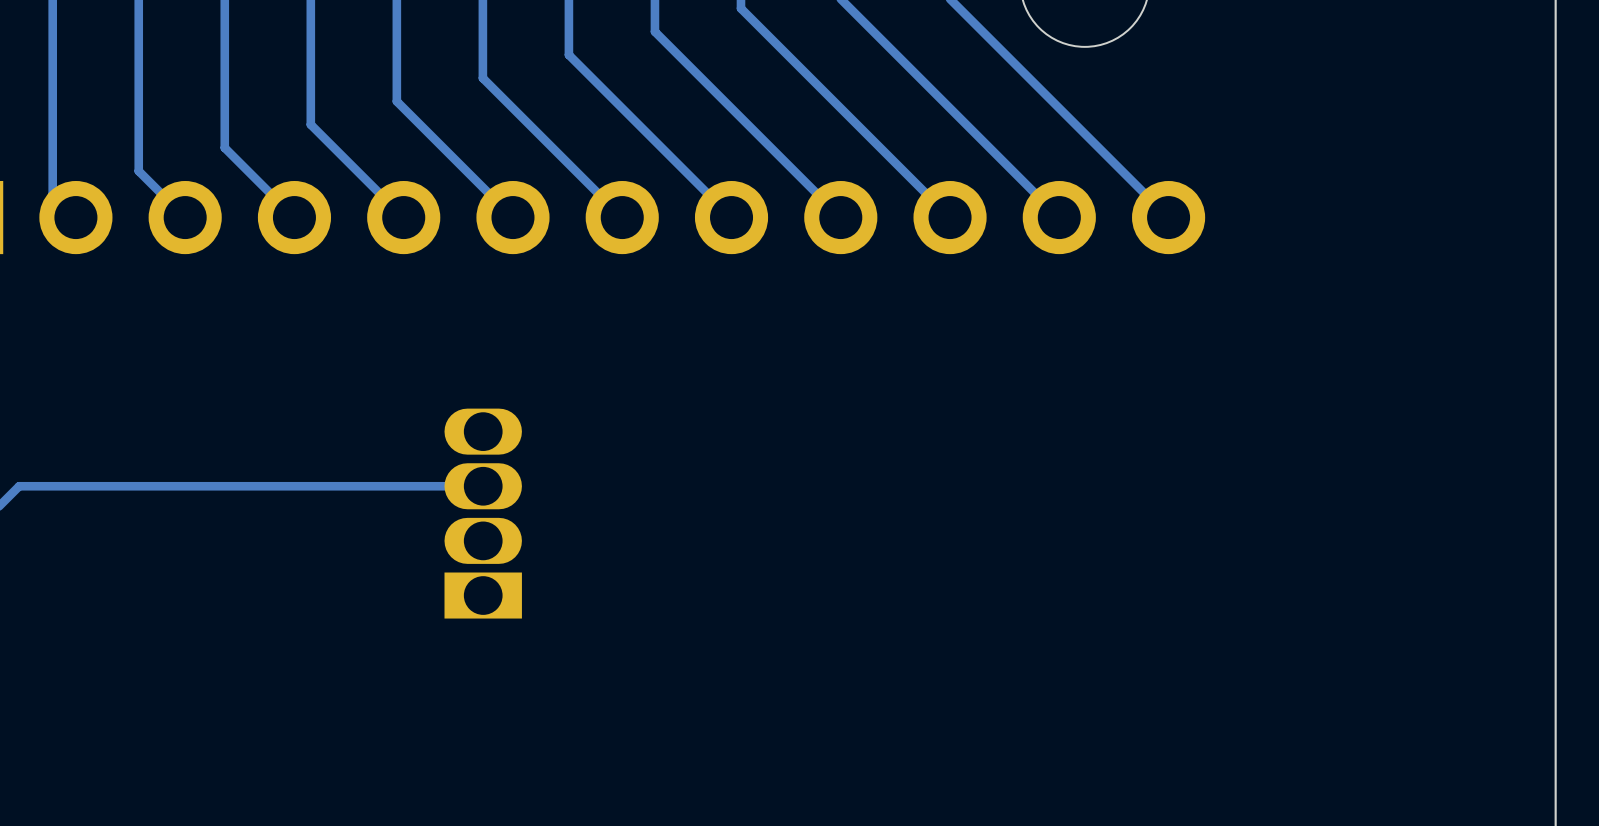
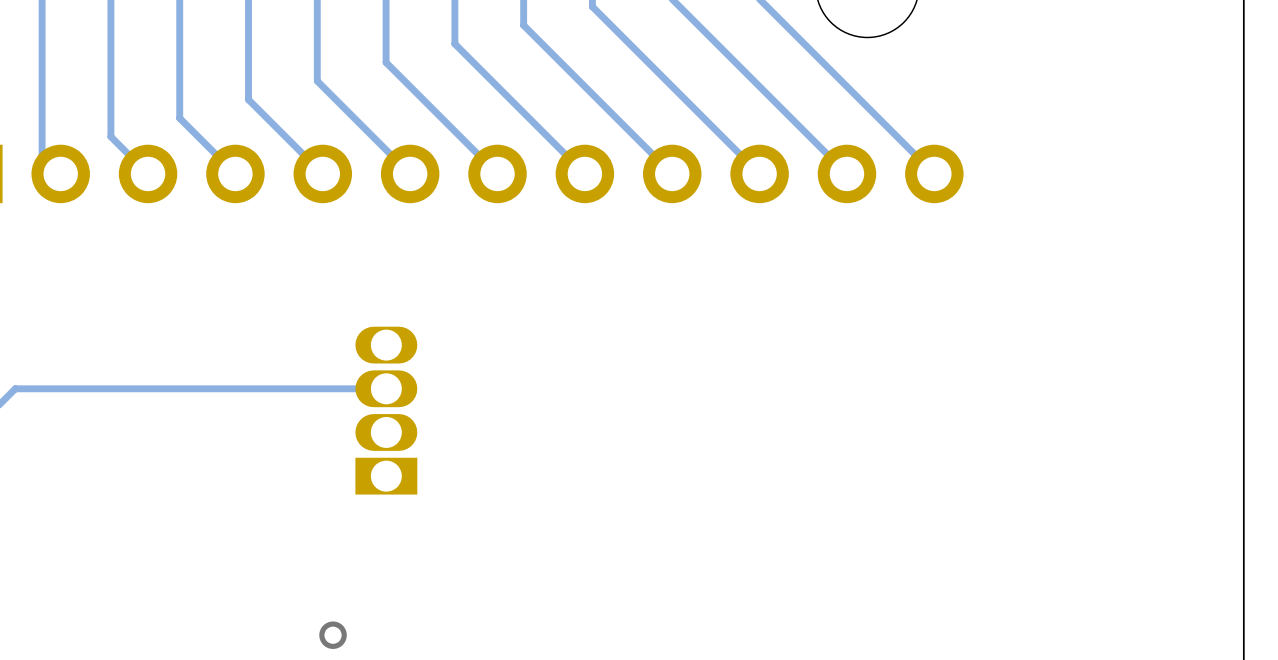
via: none -> (333, 635)

